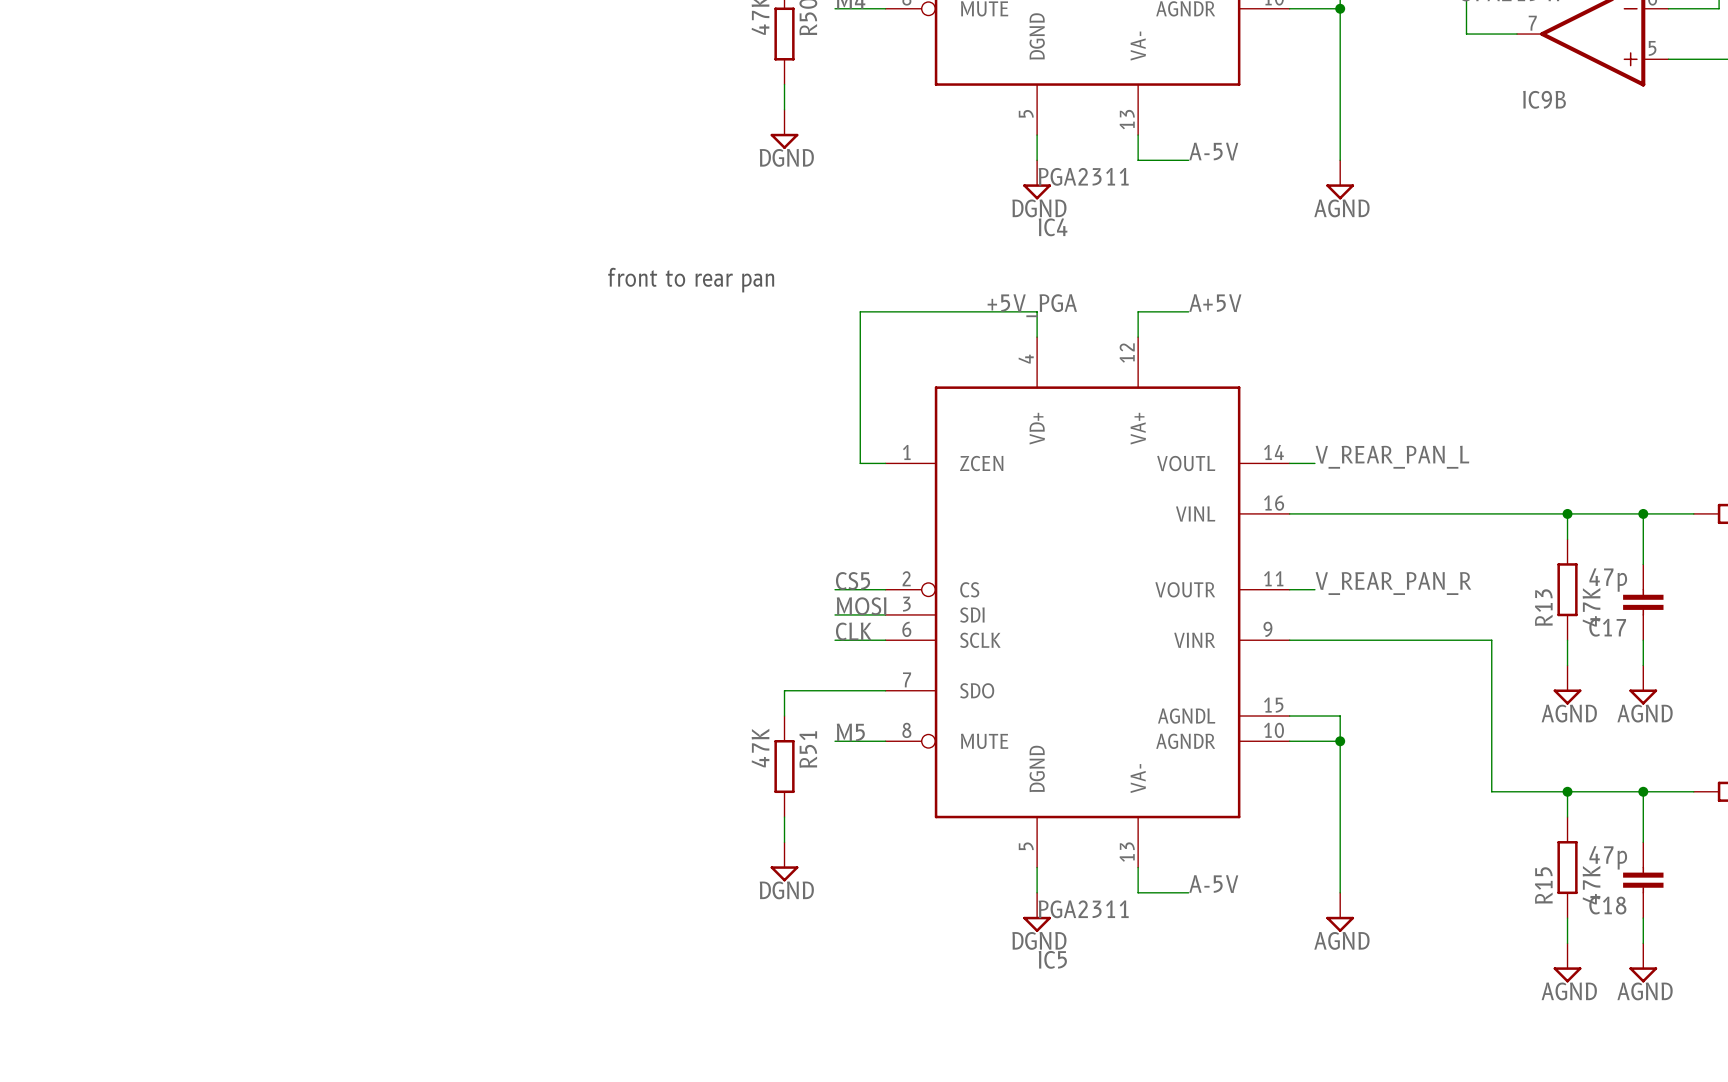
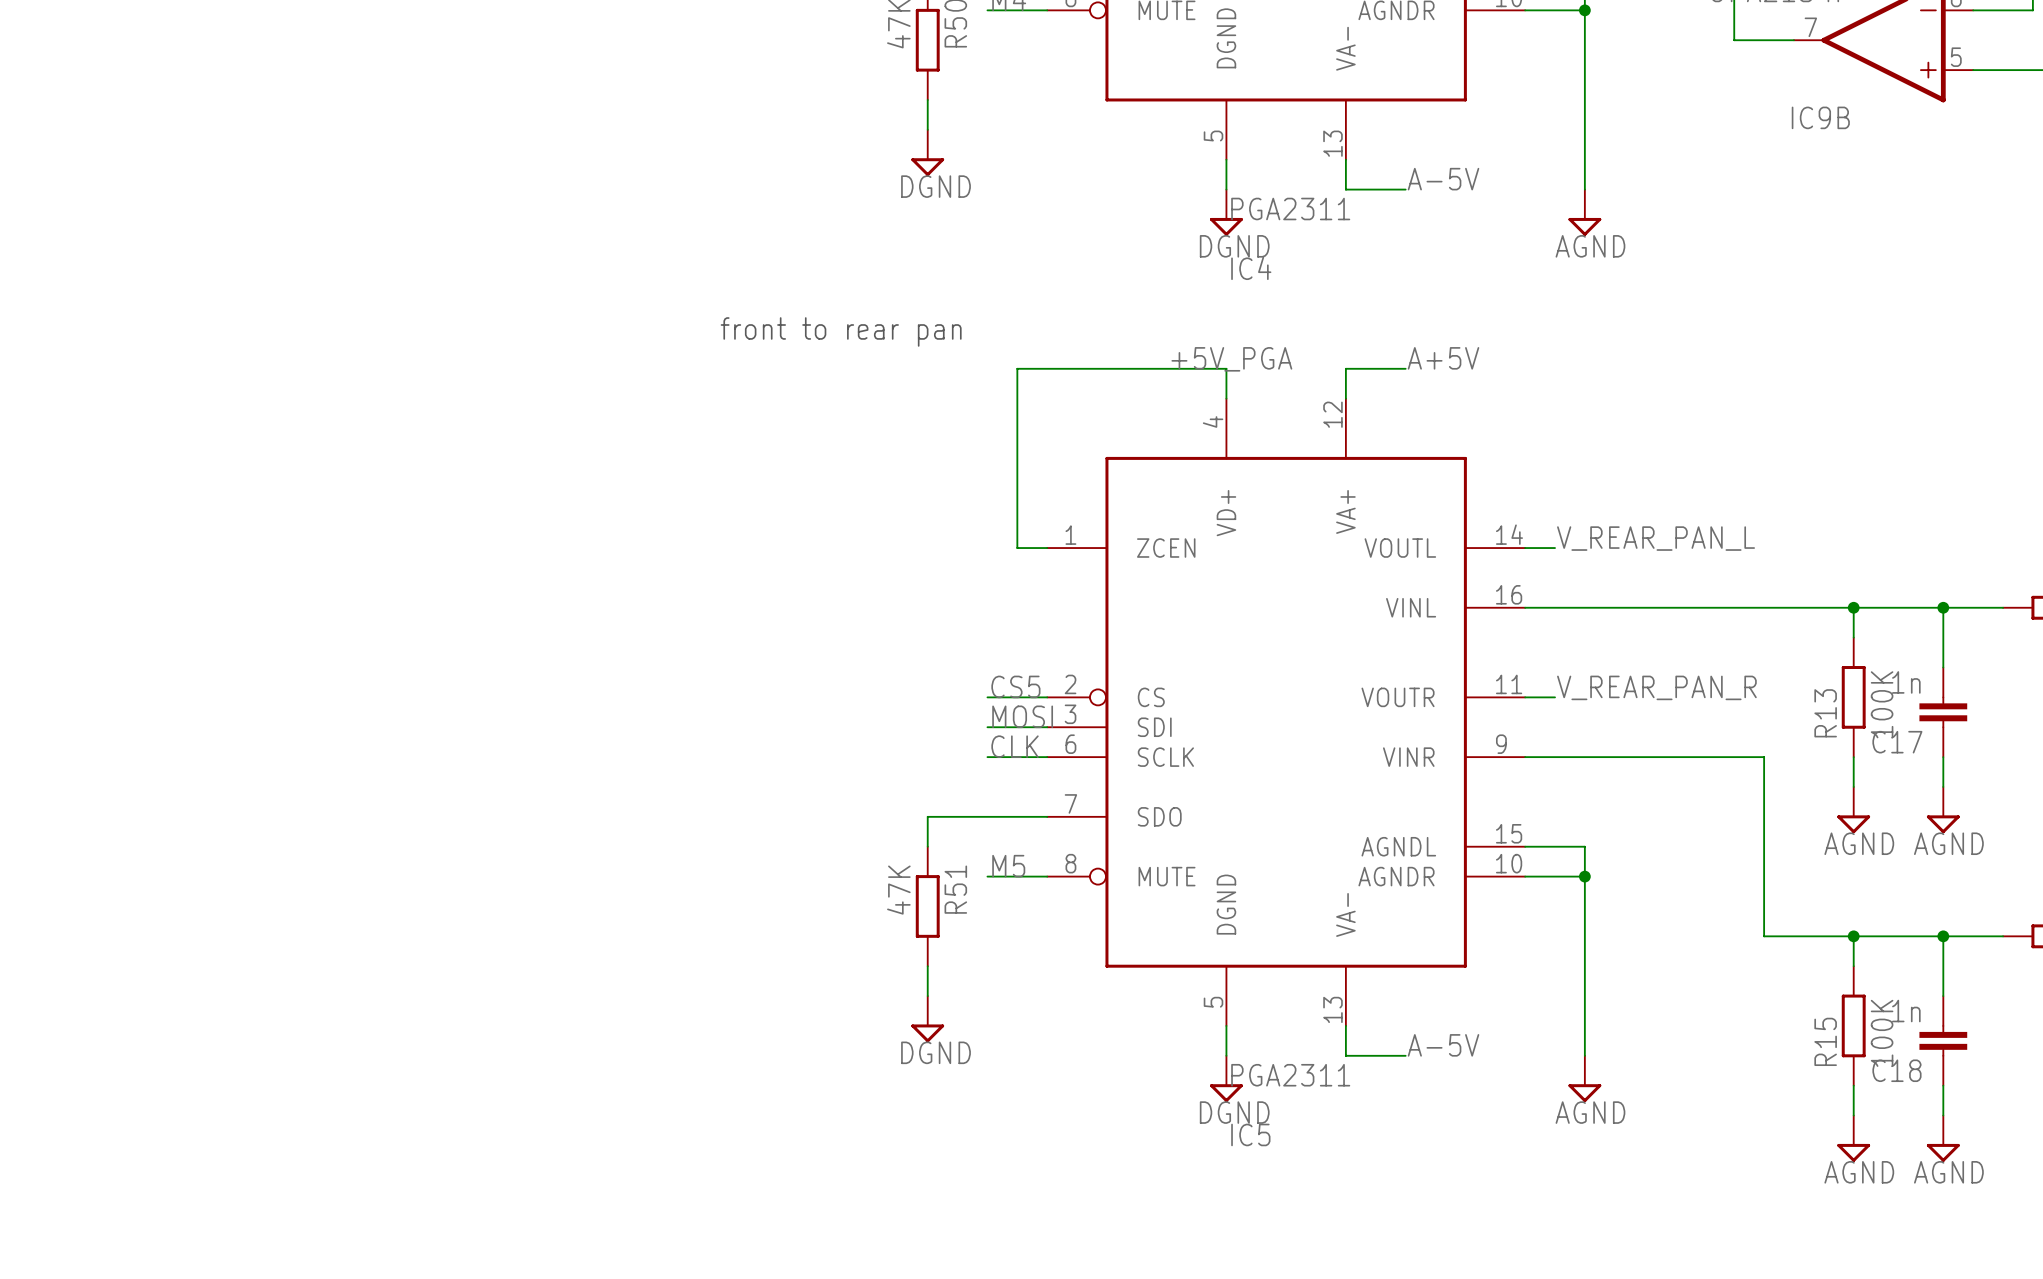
C17 value: 47p (1608, 579) -> 1n (1906, 682)
R13 value: 47K (1591, 607) -> 100K (1882, 704)
C18 value: 47p (1608, 857) -> 1n (1906, 1011)
R15 value: 47K (1591, 885) -> 100K (1882, 1033)

